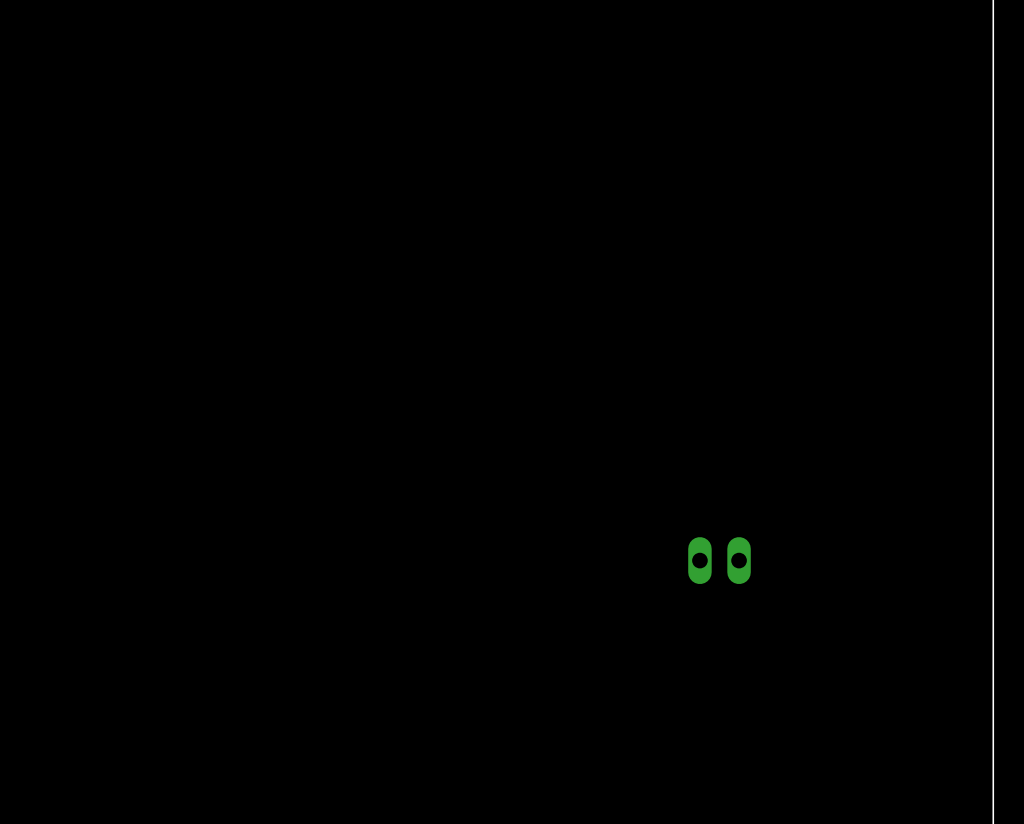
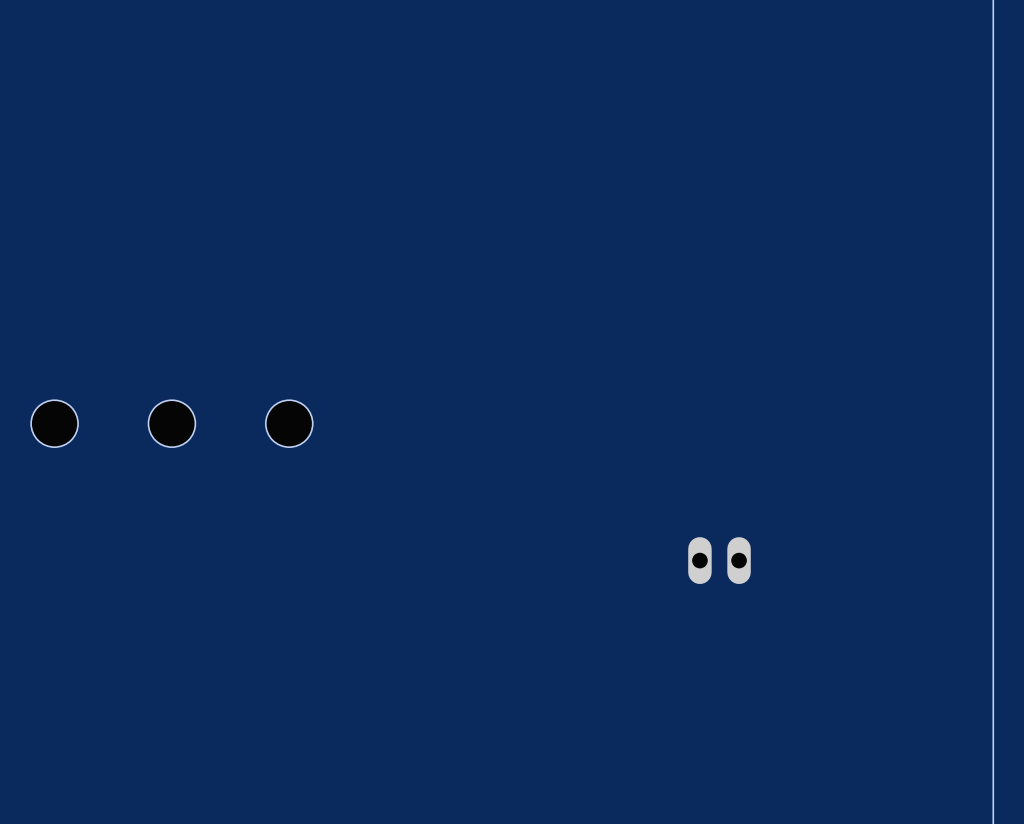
part: none -> (54, 423)
part: none -> (171, 423)
part: none -> (289, 423)

